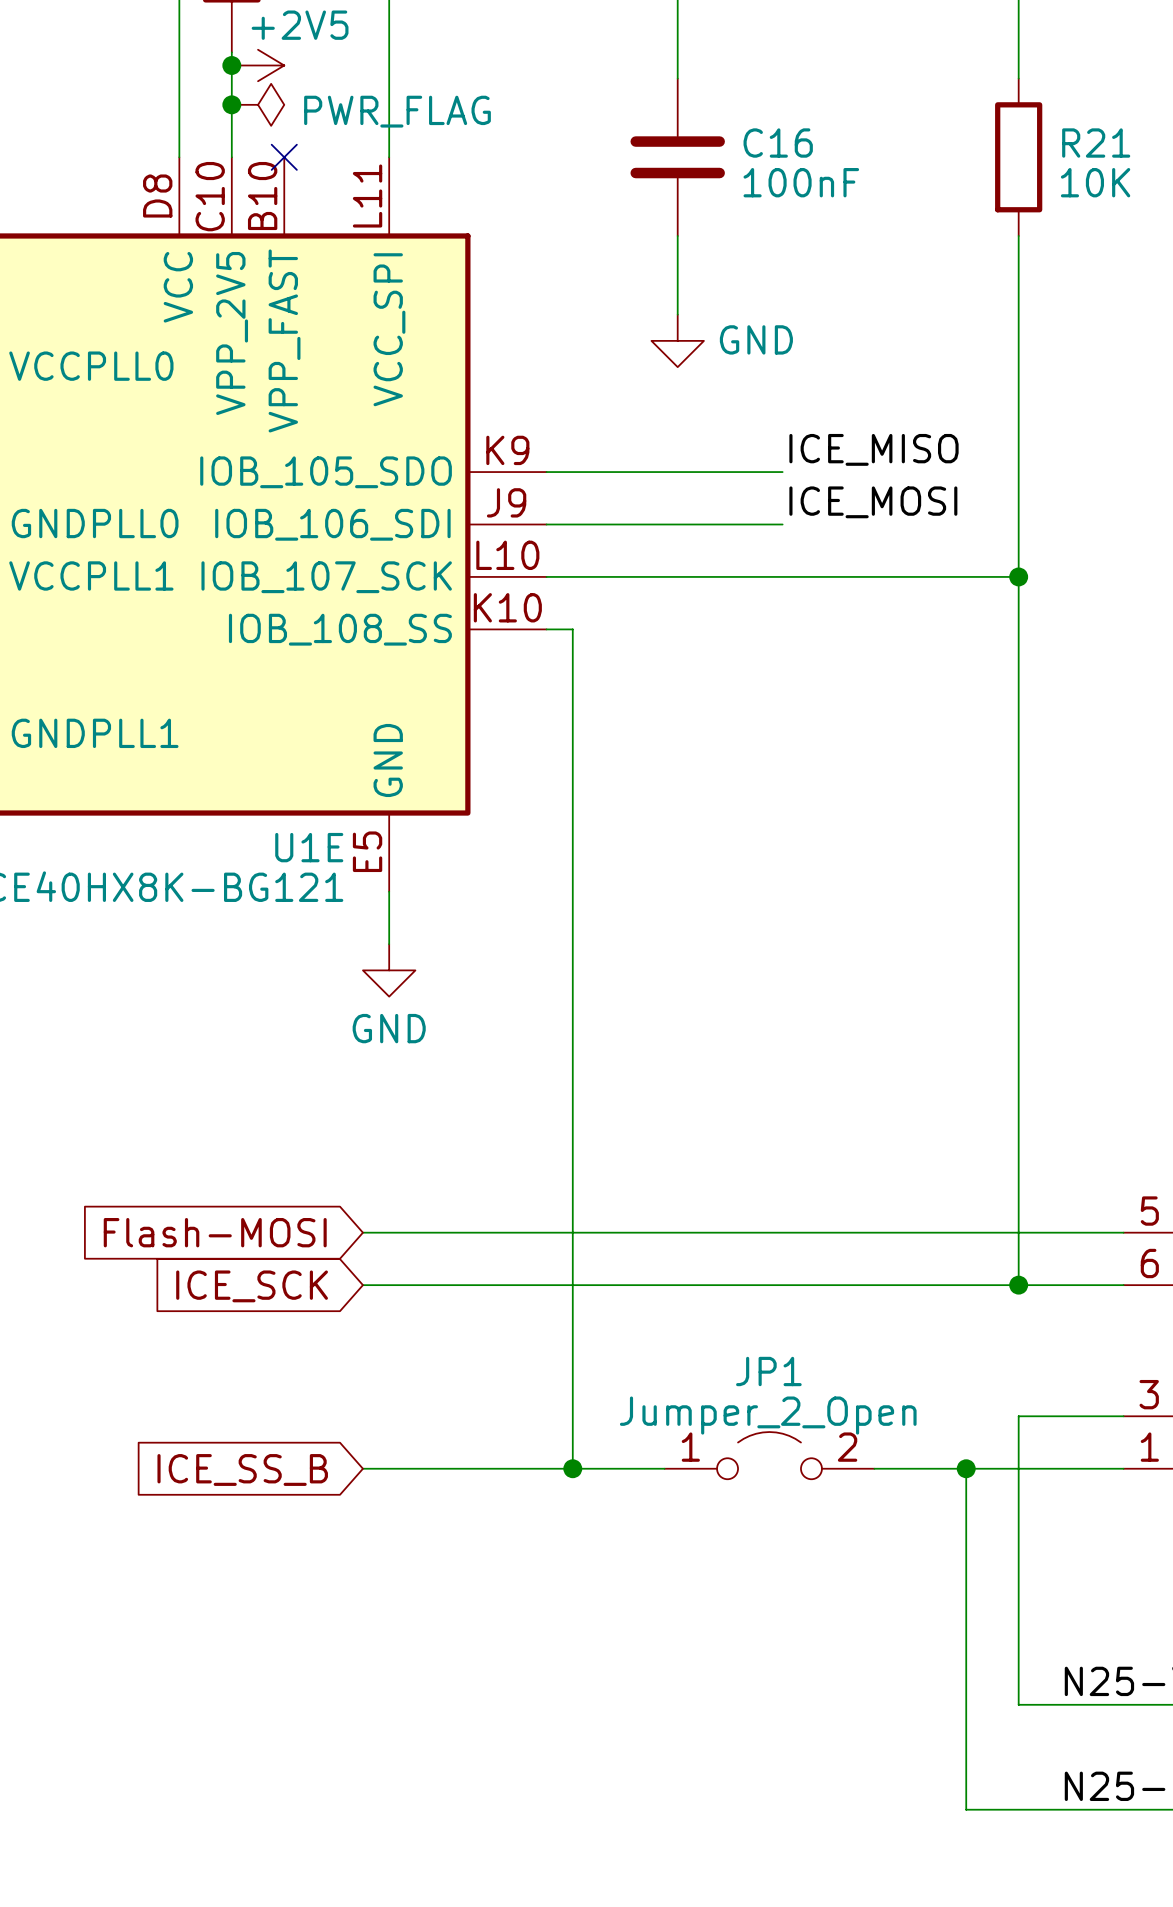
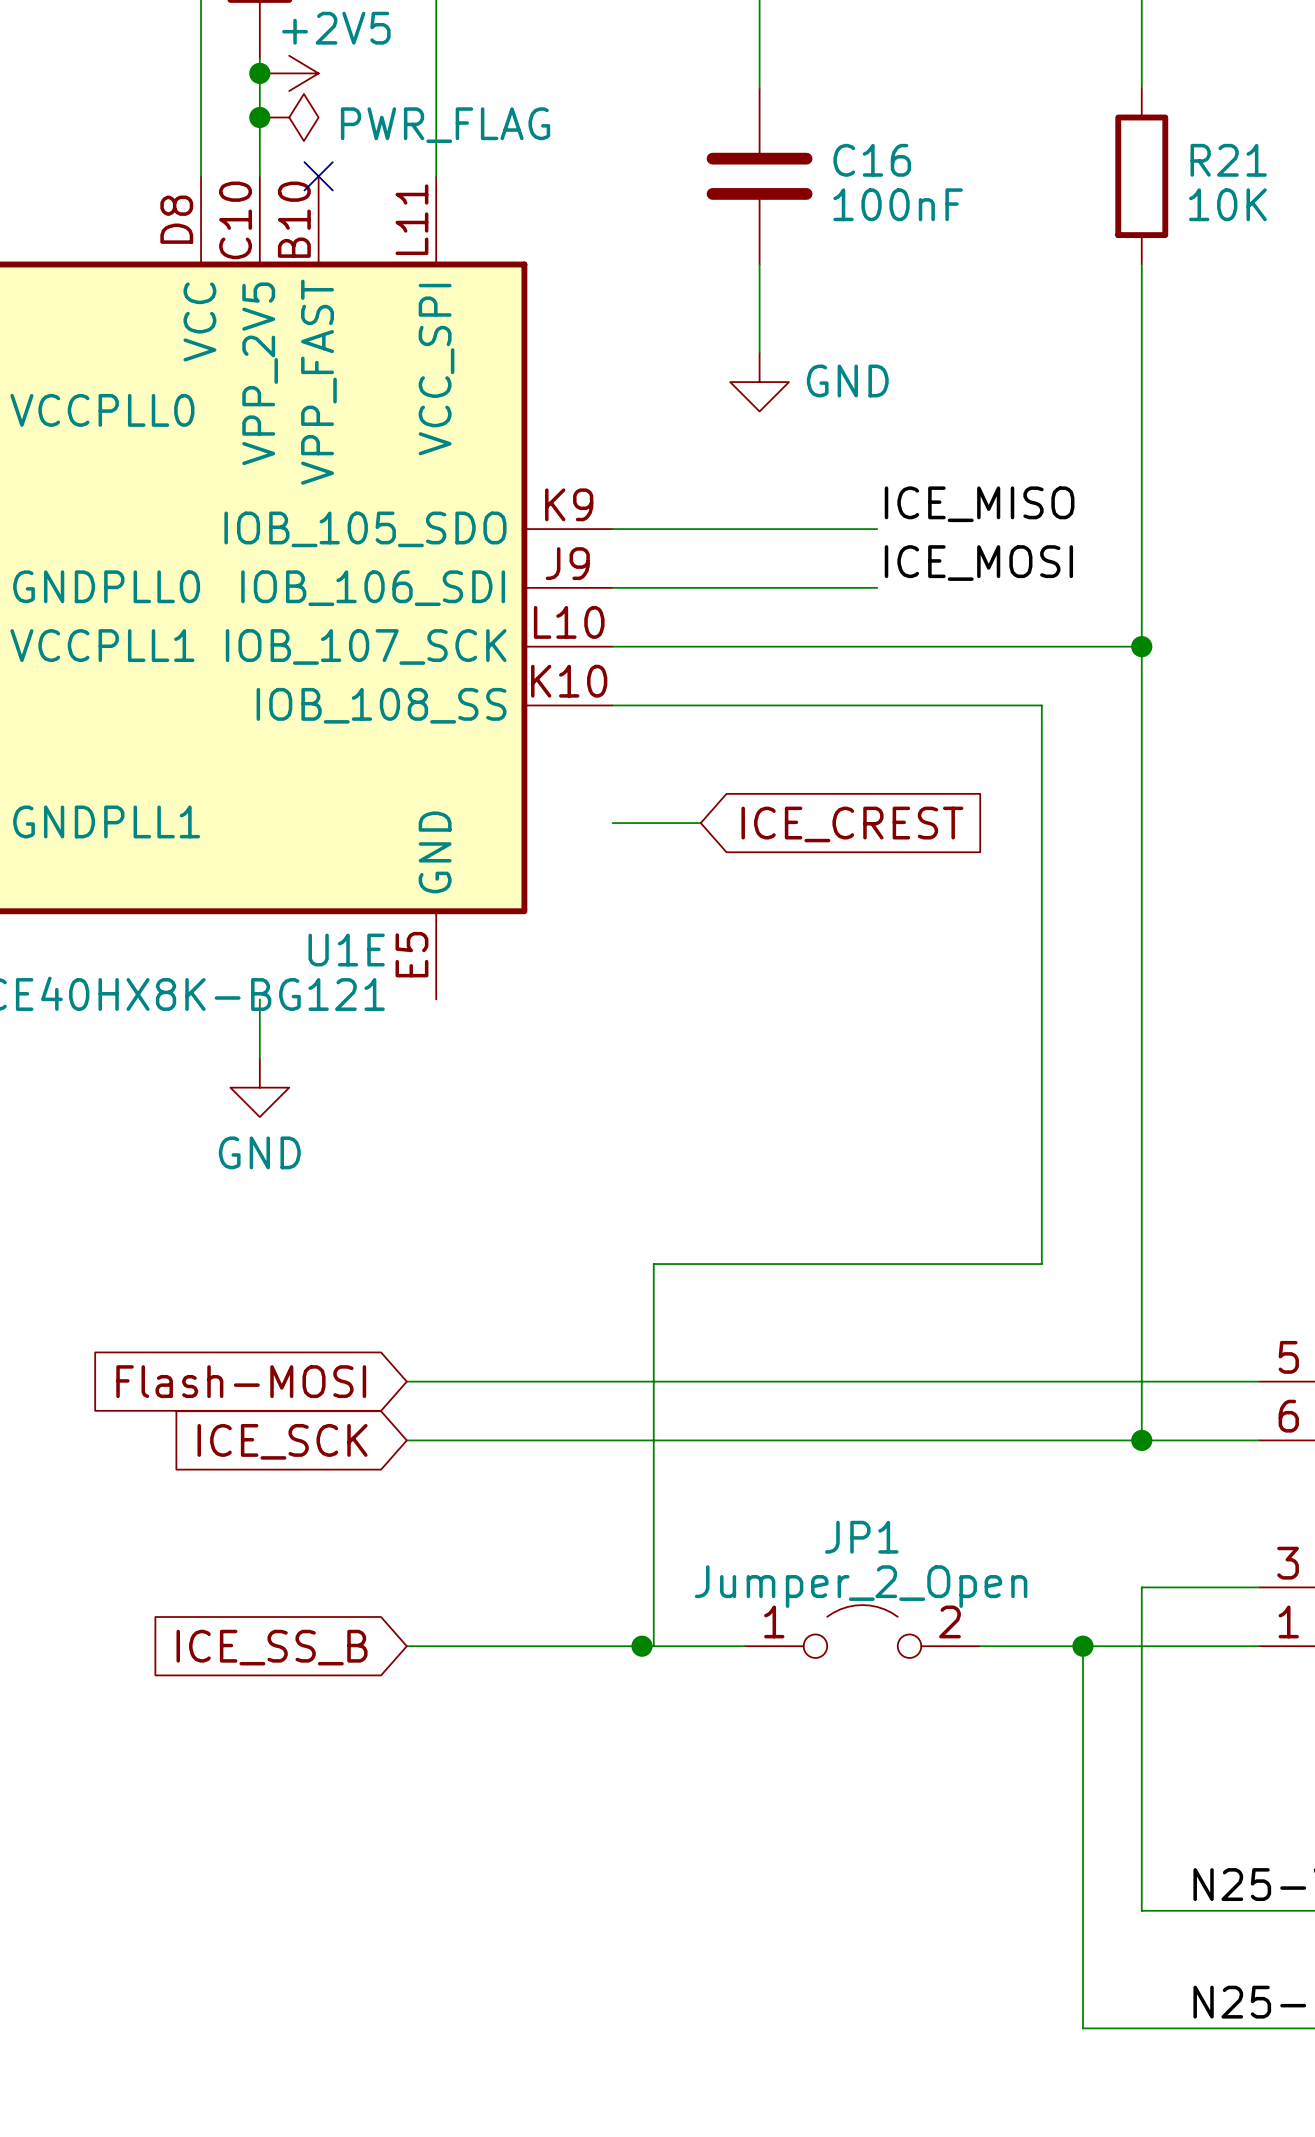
wire: (572, 629) (572, 1468) -> (642, 705) (1041, 705) (1041, 1264) (653, 1264) (653, 1646)
wire: none -> (612, 823) (700, 823)
global label: none -> ICE_CREST (852, 824)
wire: (389, 891) (389, 944) -> (259, 999) (259, 1058)
power symbol position: GND (389, 970) -> GND (259, 1087)

